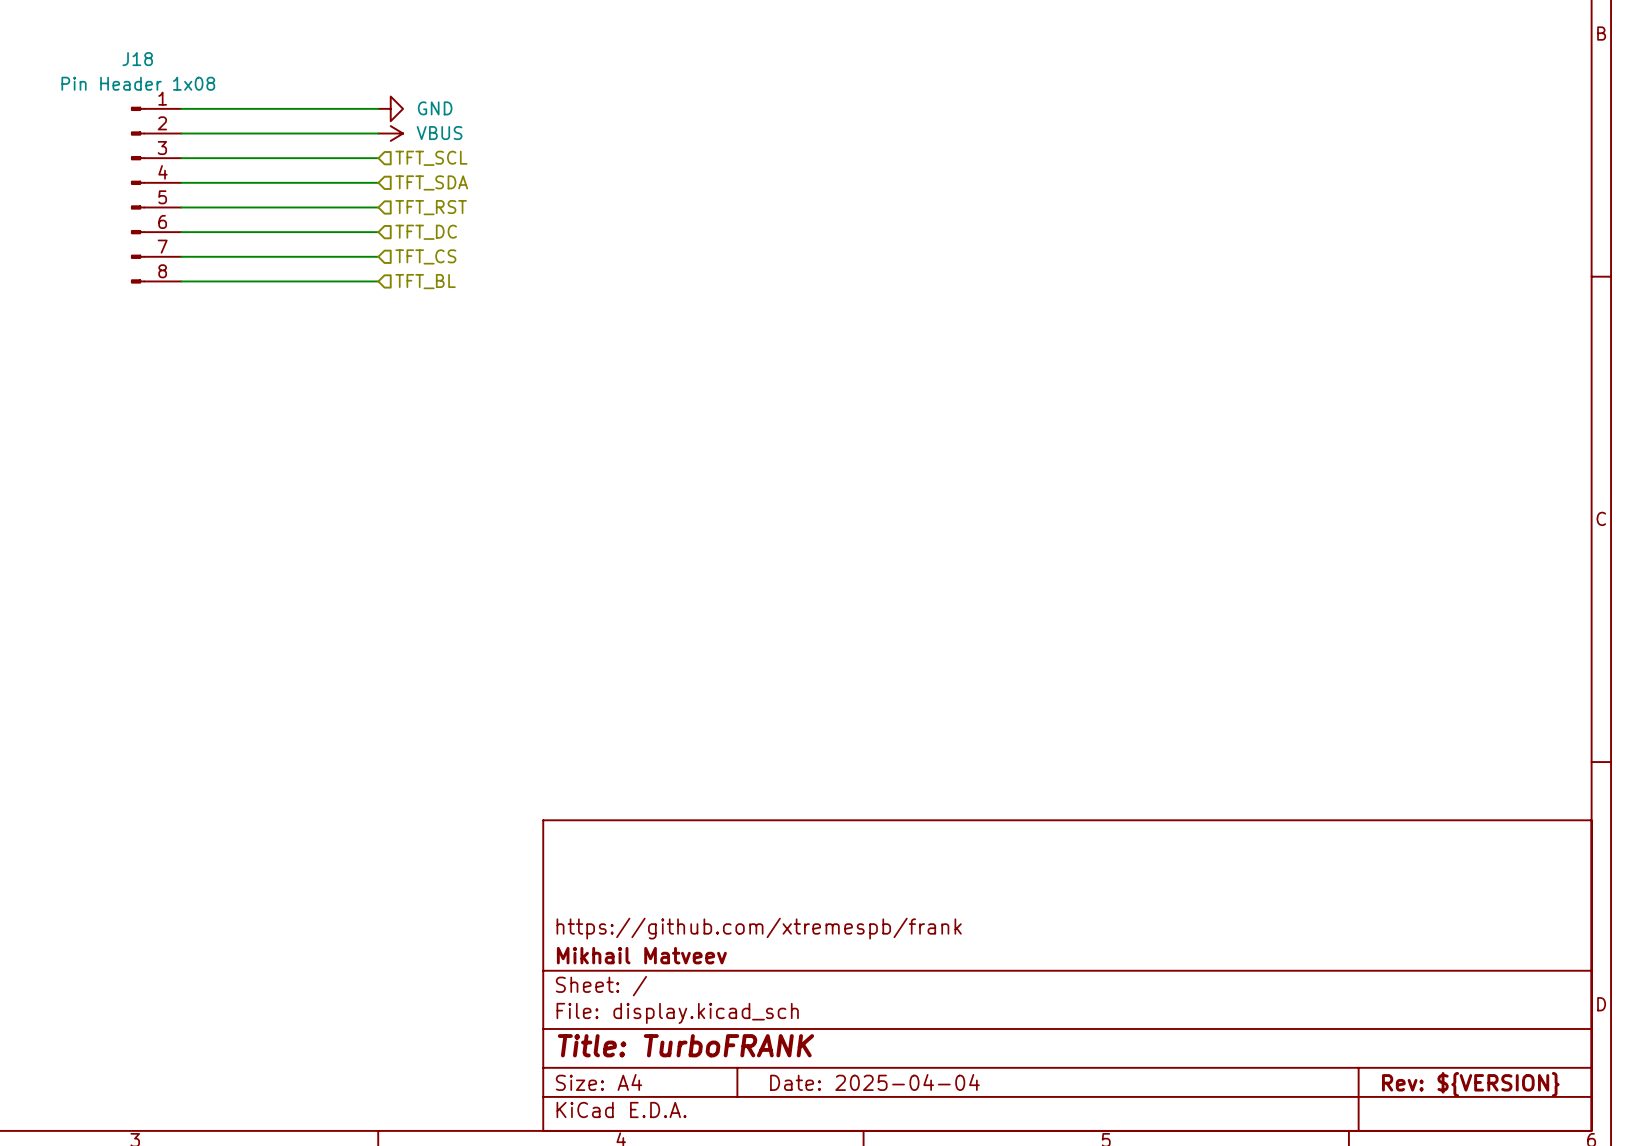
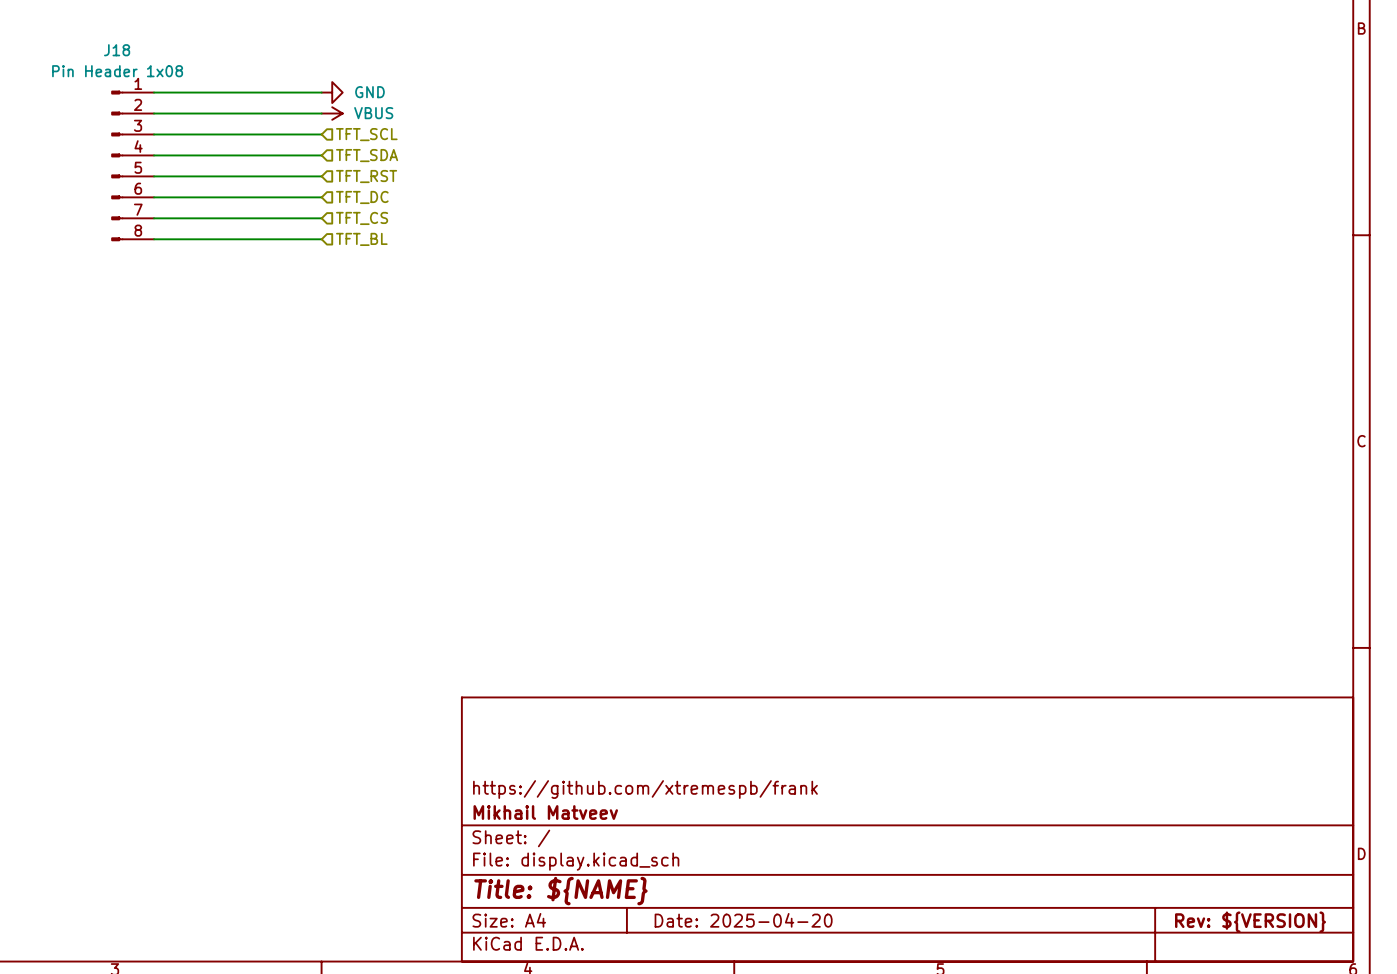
title block: Title: TurboFRANK (685, 1045) -> Title: ${NAME} (560, 891)
title block: Date: 2025-04-04 (874, 1082) -> Date: 2025-04-20 (743, 920)

